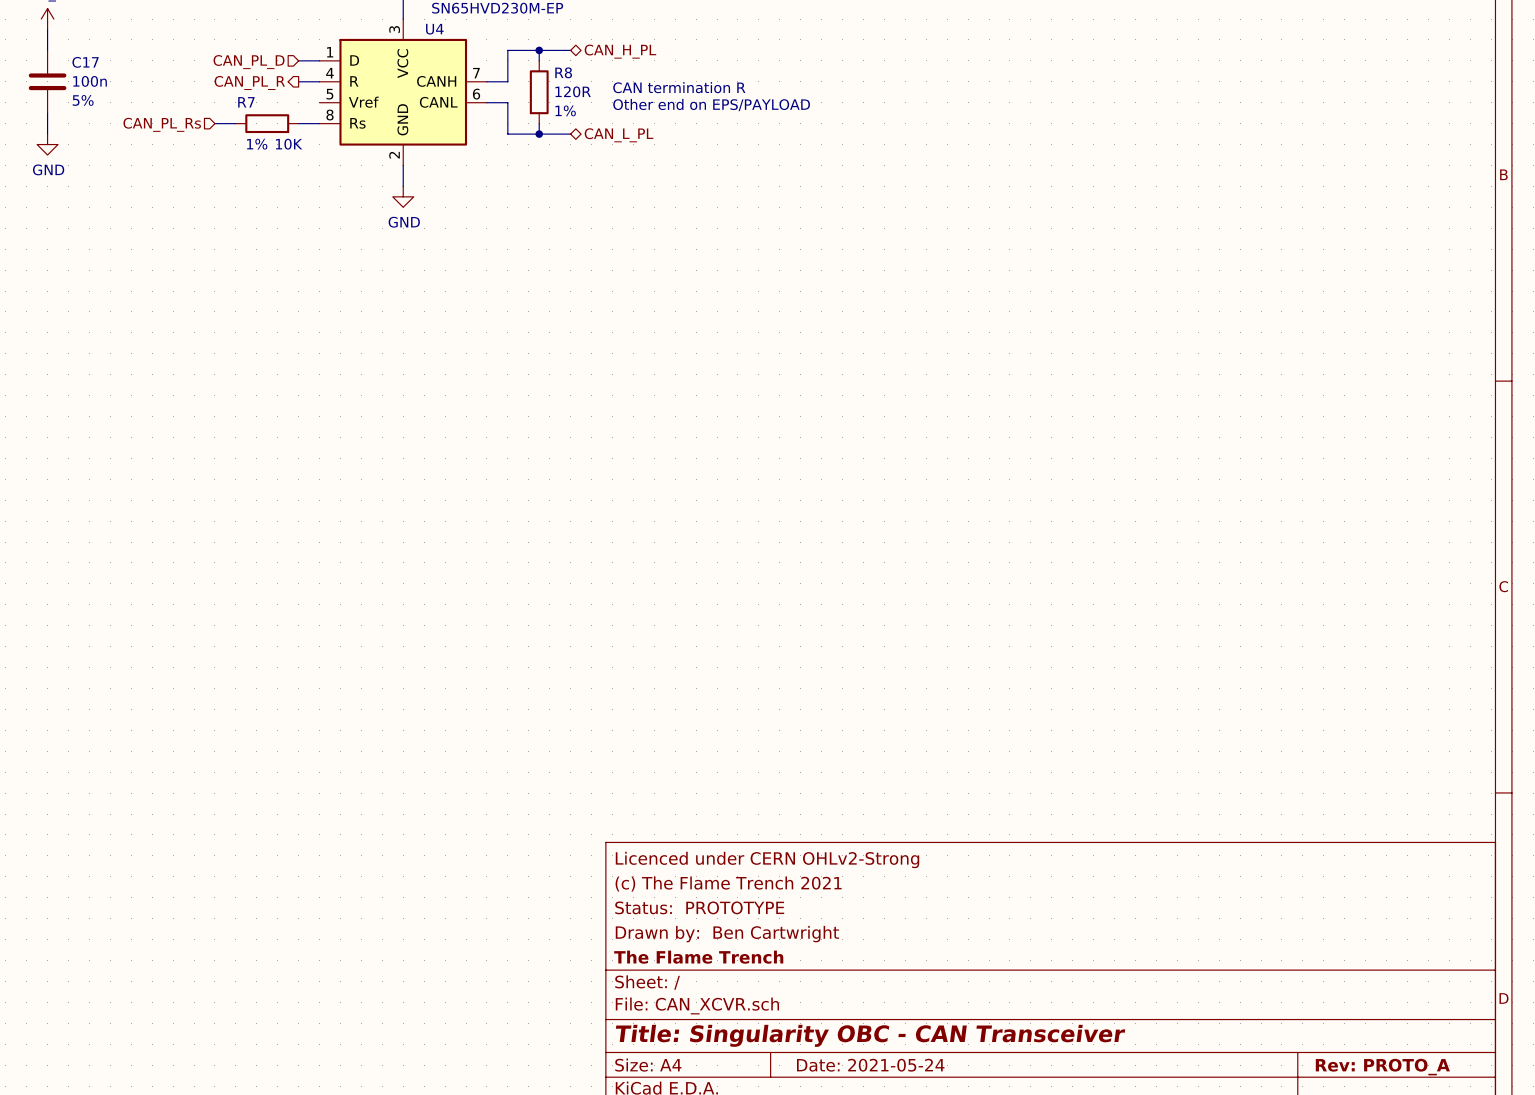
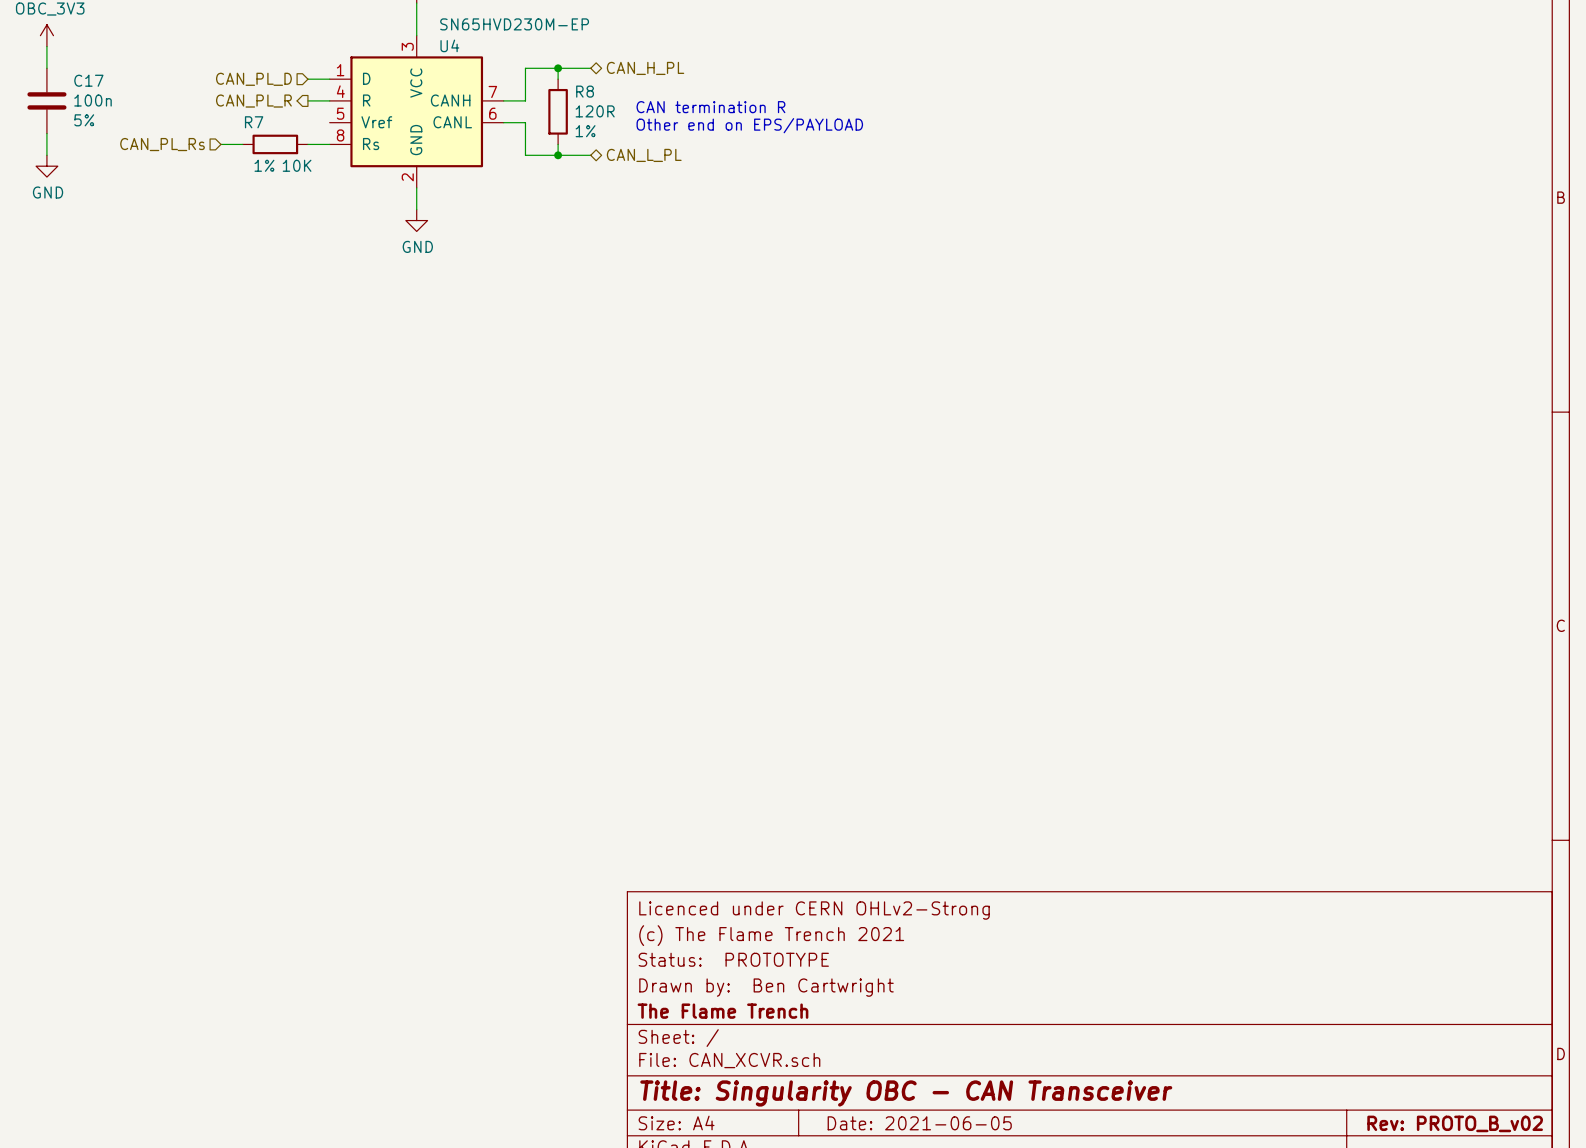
title block: Date: 2021-05-24 (870, 1065) -> Date: 2021-06-05 (919, 1123)
title block: Rev: PROTO_A (1382, 1067) -> Rev: PROTO_B_v02 (1455, 1123)

